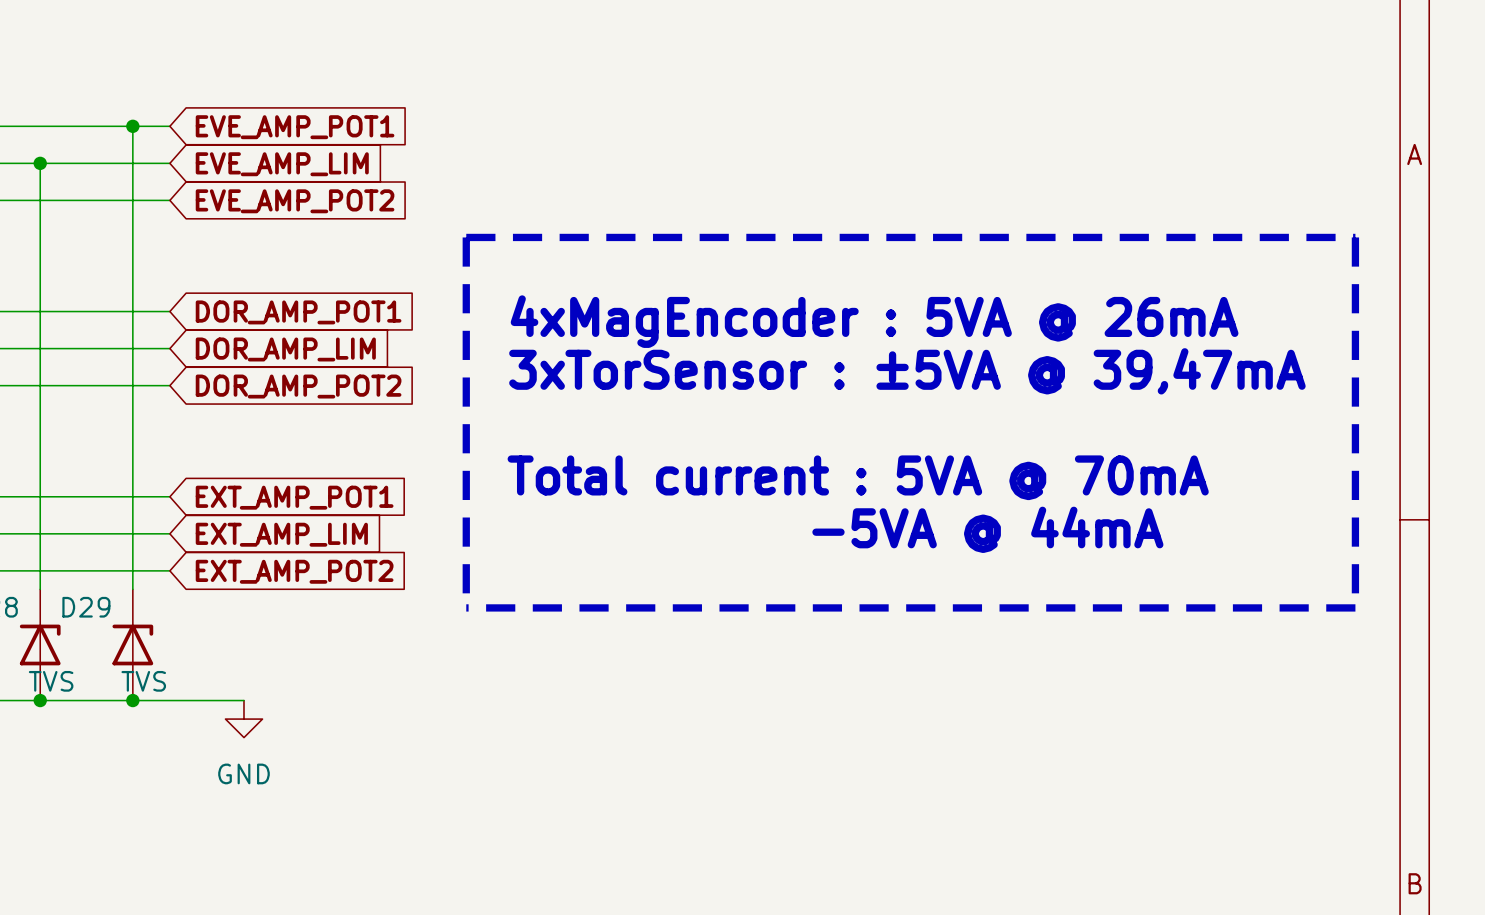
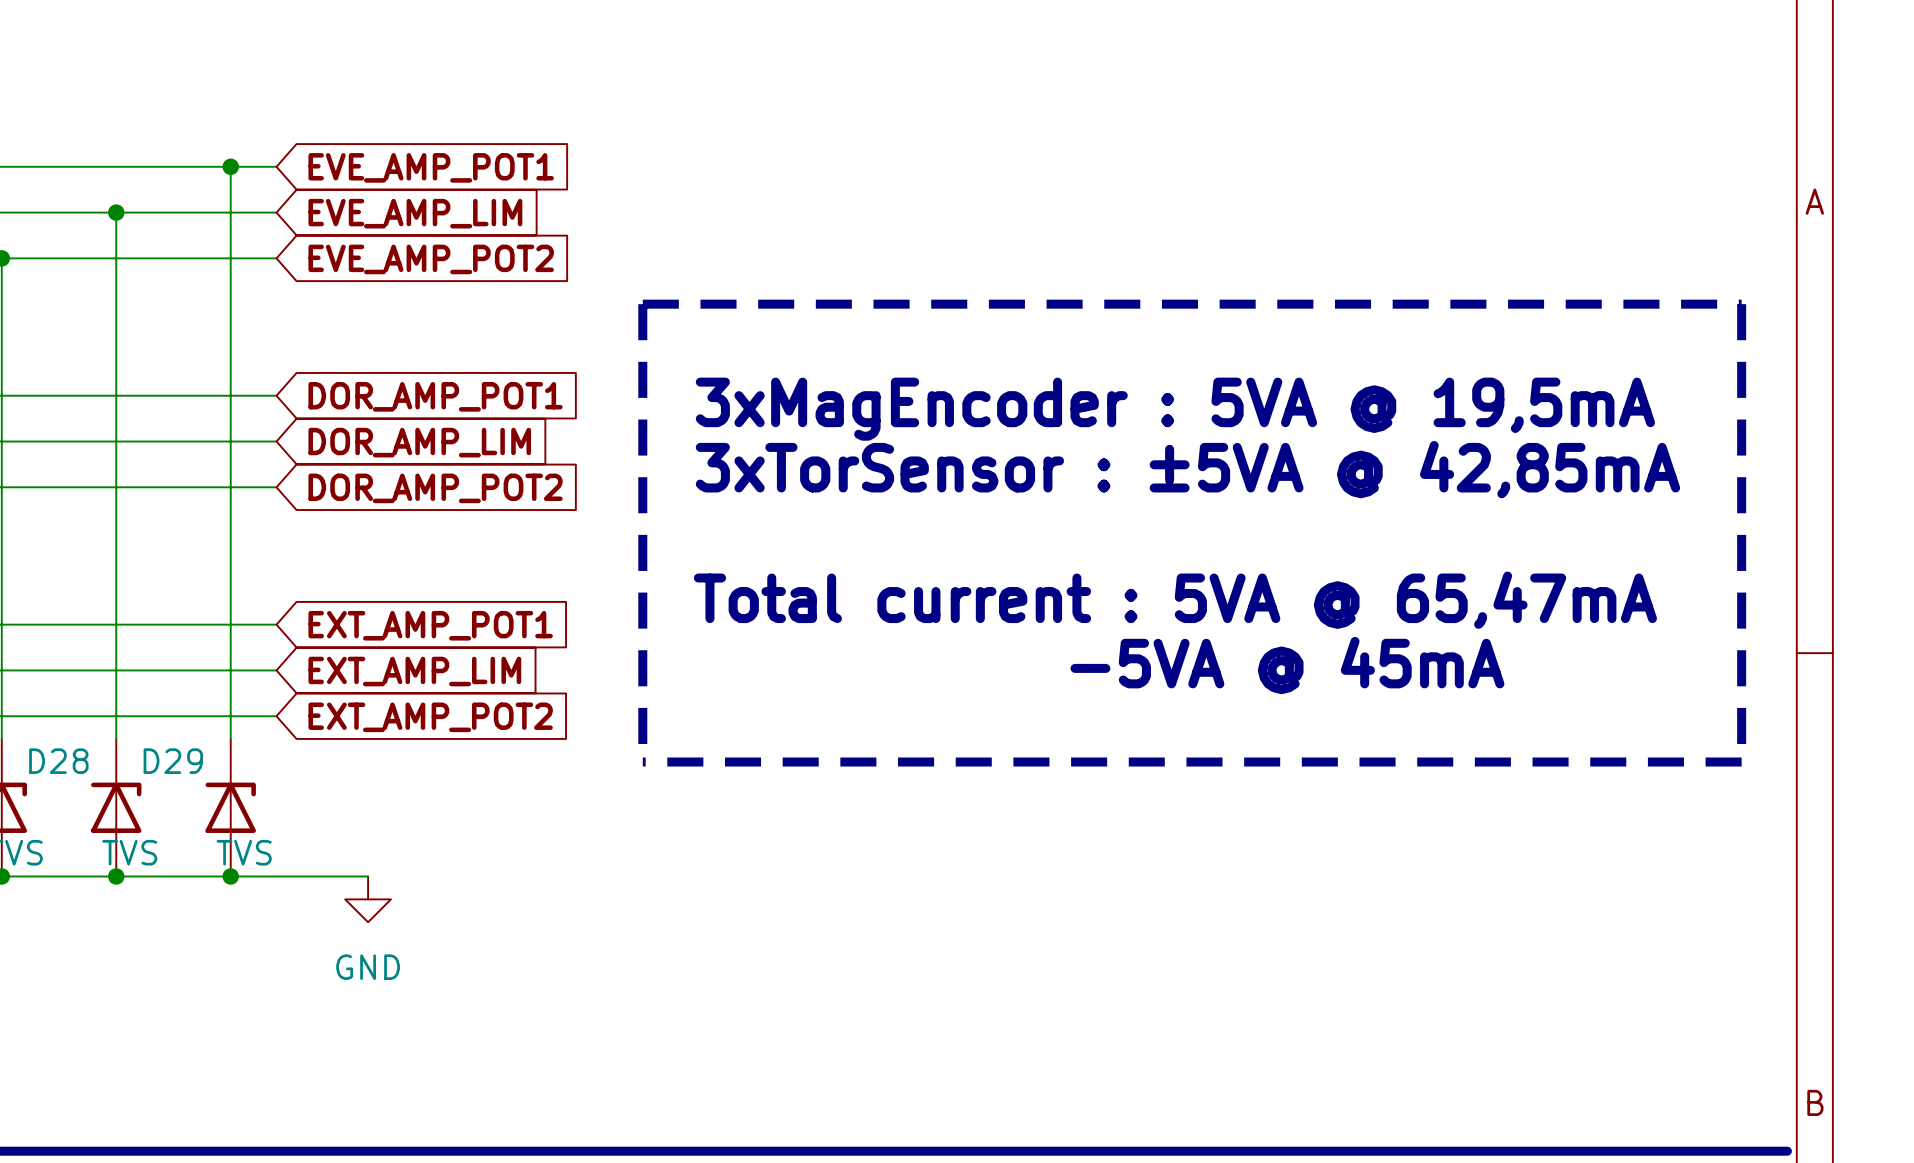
text: 4xMagEncoder : 5VA @ 26mA (874, 321) -> 3xMagEncoder : 5VA @ 19,5mA (1175, 409)
text: 3xTorSensor : ±5VA @ 39,47mA (907, 371) -> 3xTorSensor : ±5VA @ 42,85mA (1187, 469)
text: Total current : 5VA @ 70mA (858, 477) -> Total current : 5VA @ 65,47mA (1175, 600)
text: -5VA @ 44mA (987, 529) -> -5VA @ 45mA (1287, 665)

